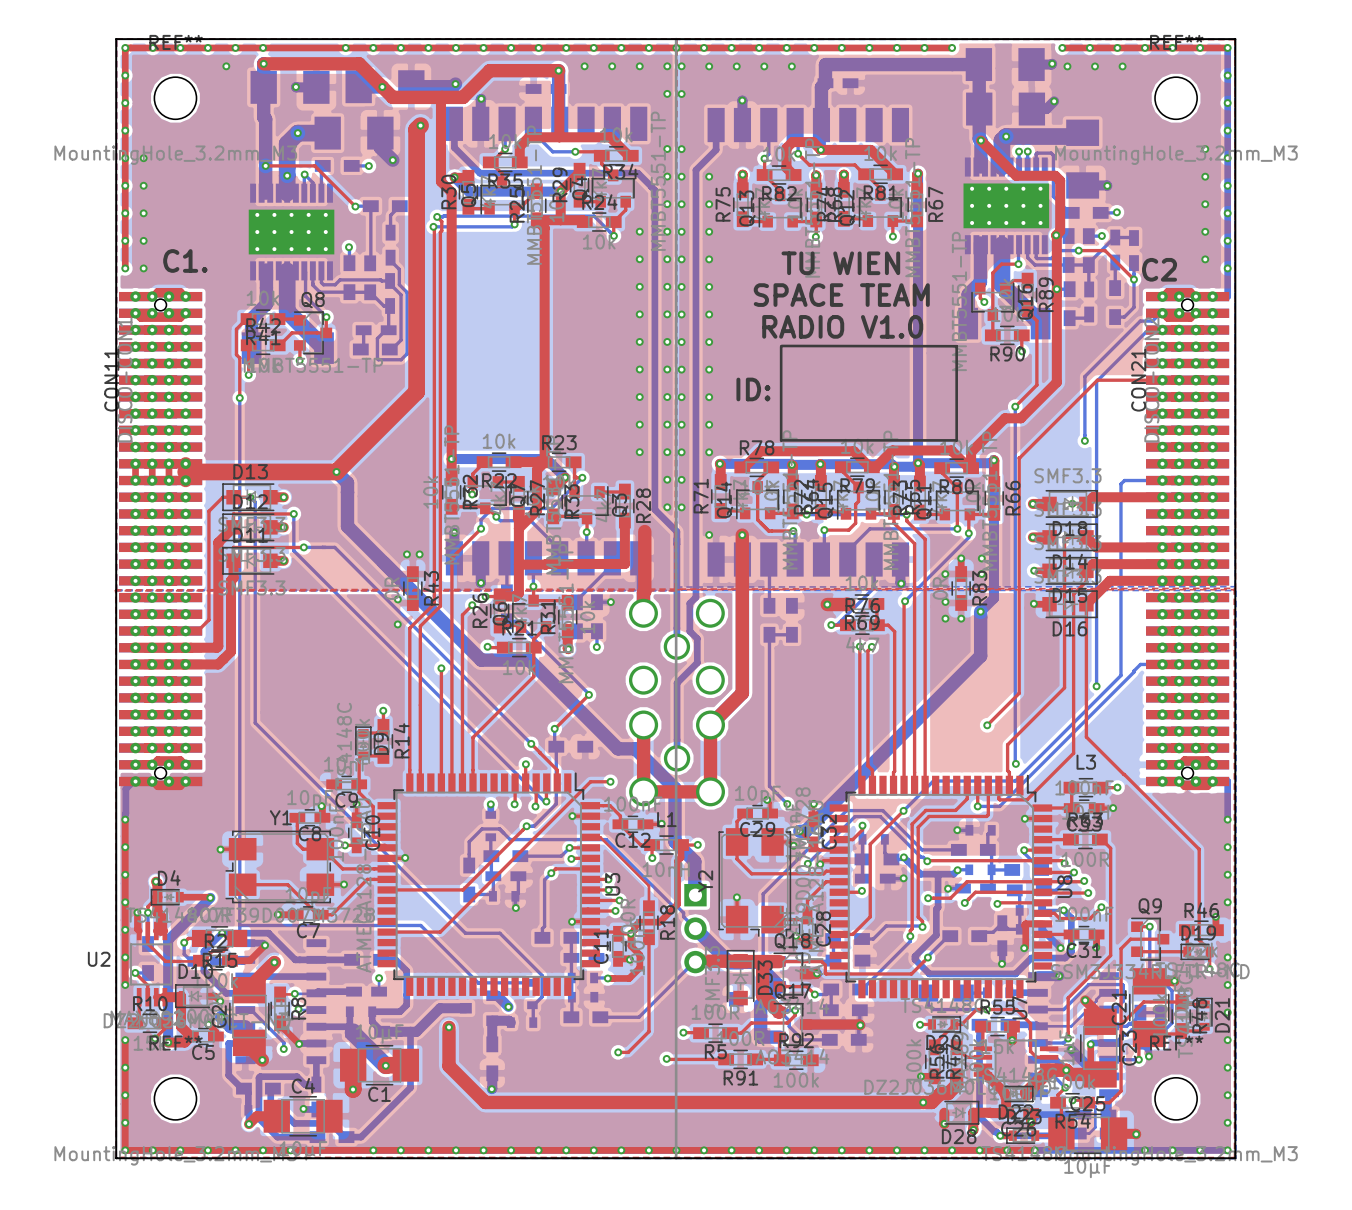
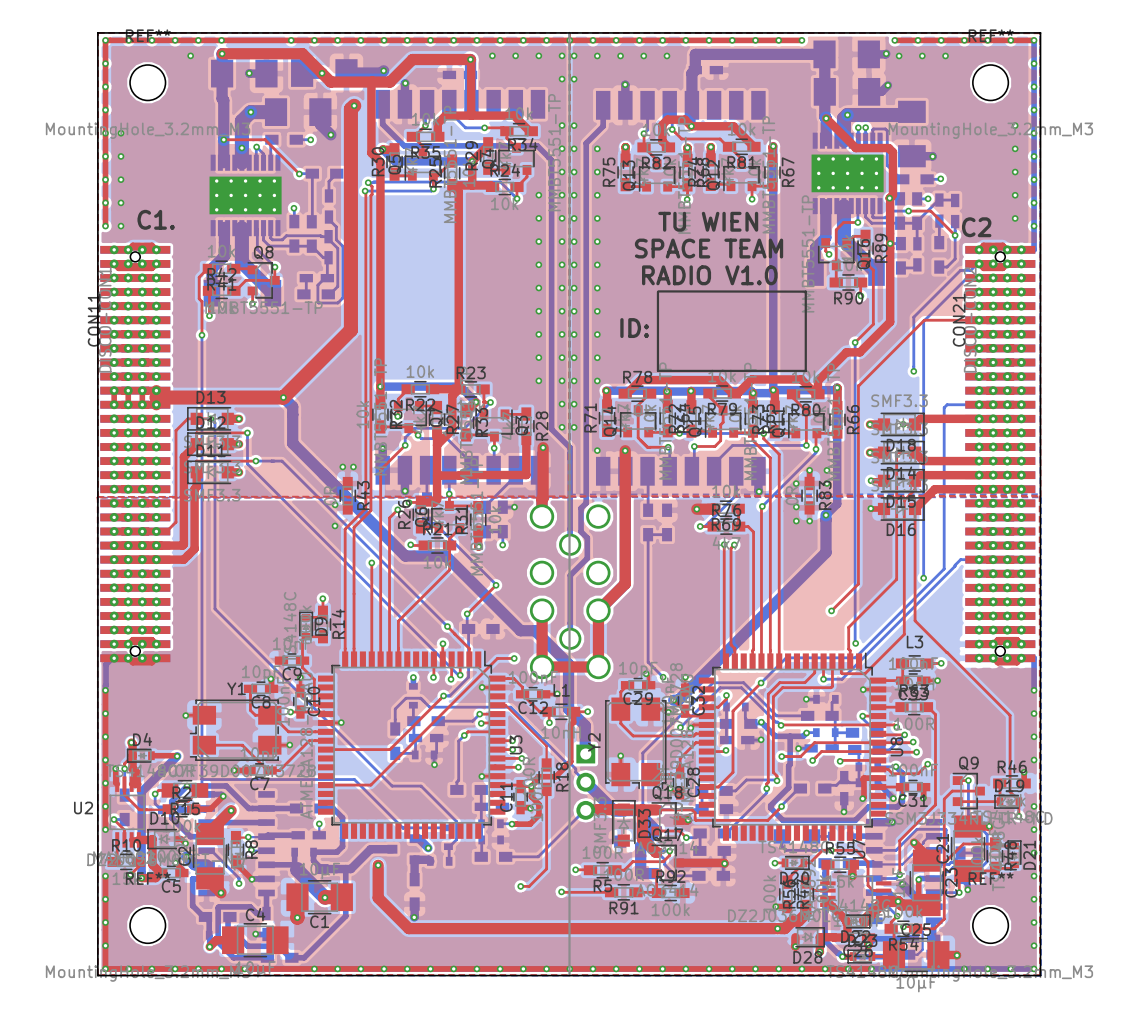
via: none -> (543, 447)

